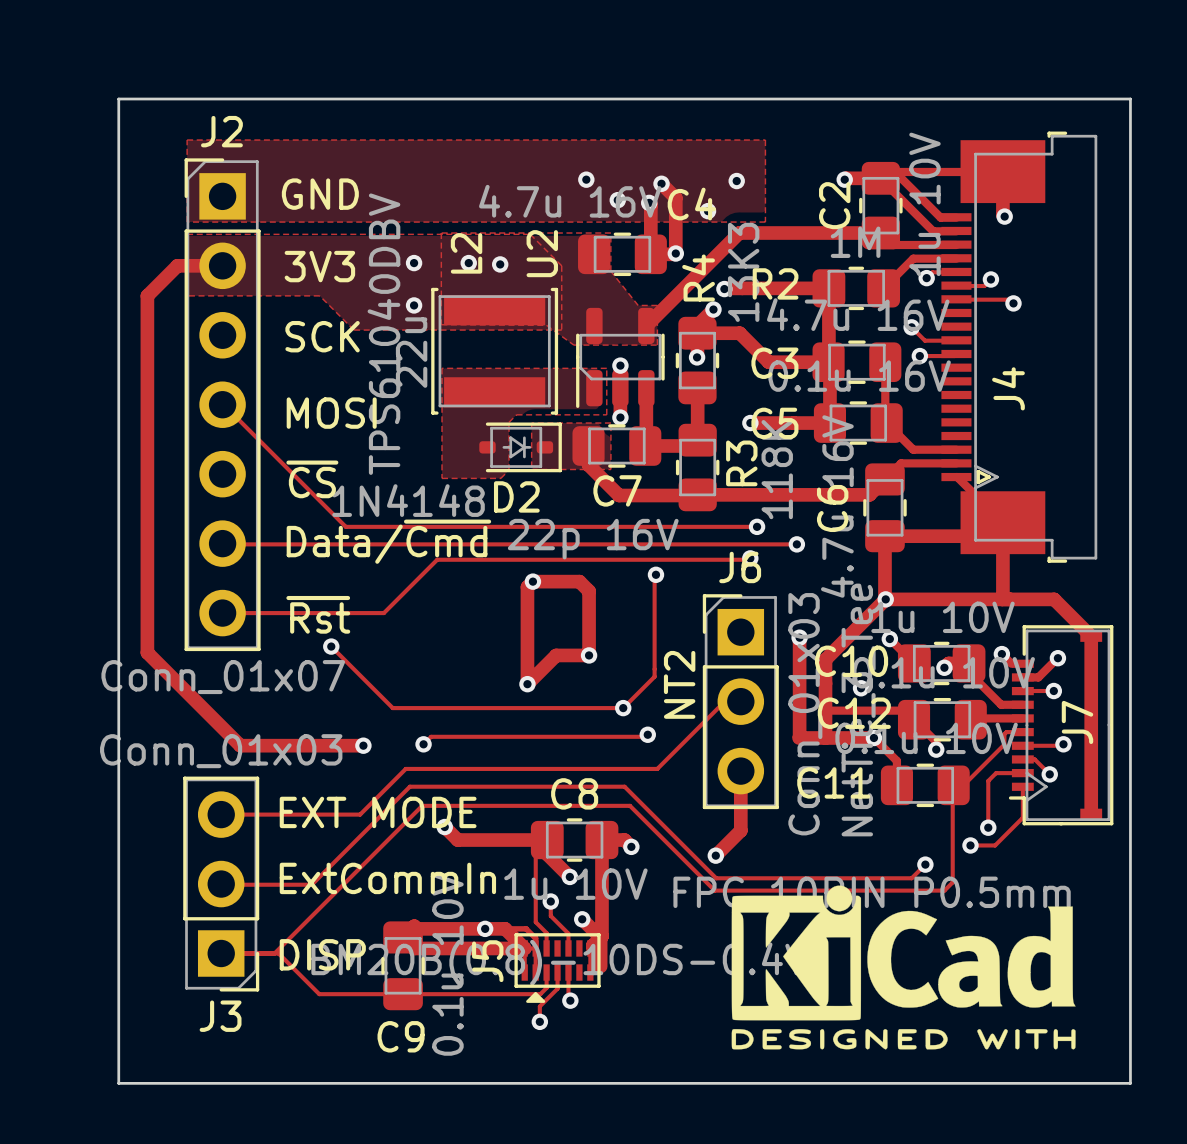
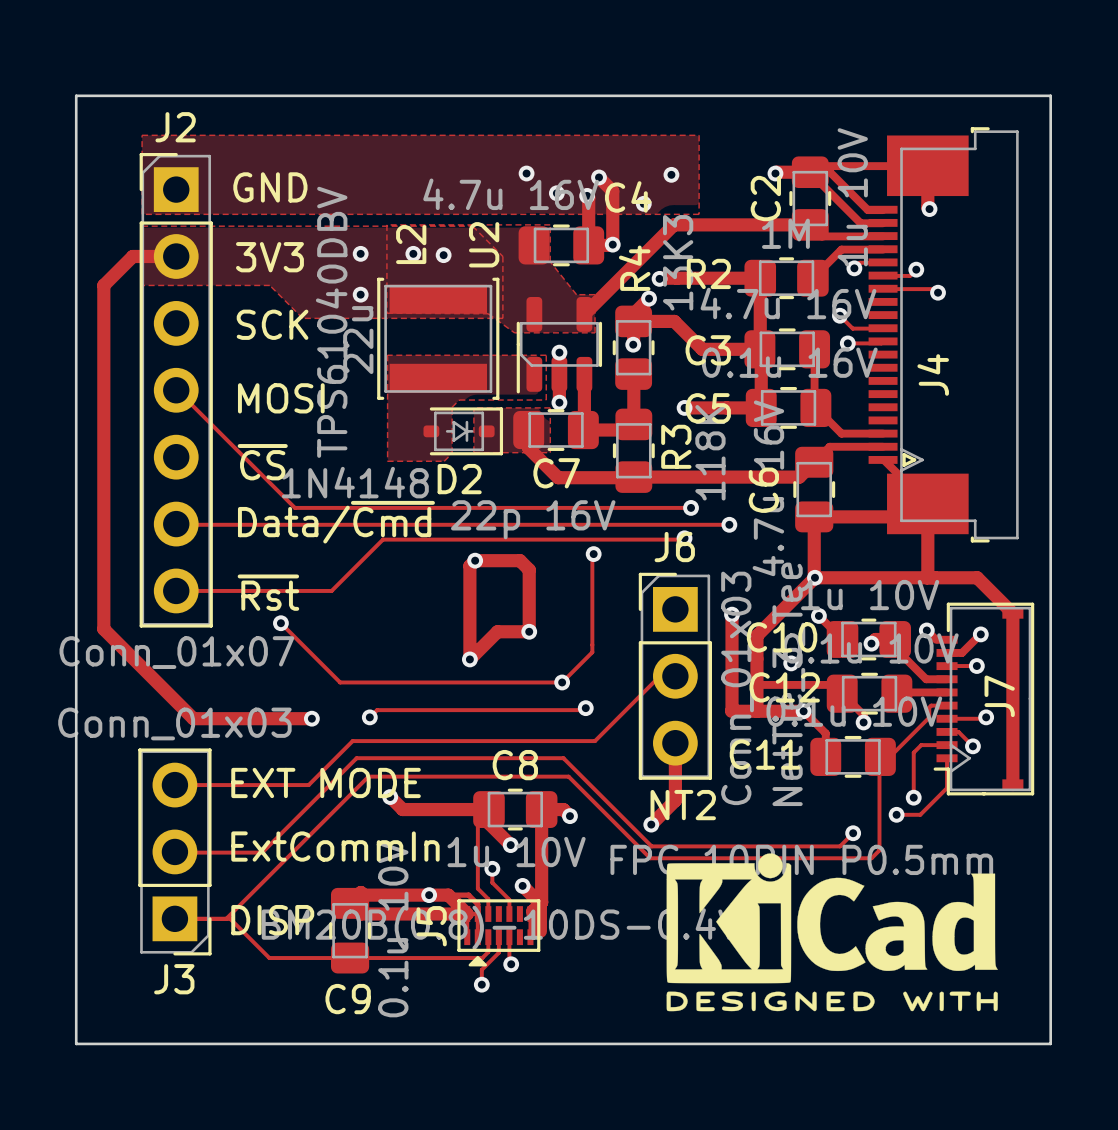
NT2 name rotation: 0° (679, 684) -> 90° clockwise (683, 805)
NT2 name position: NT2 (679, 684) -> NT2 (683, 805)

